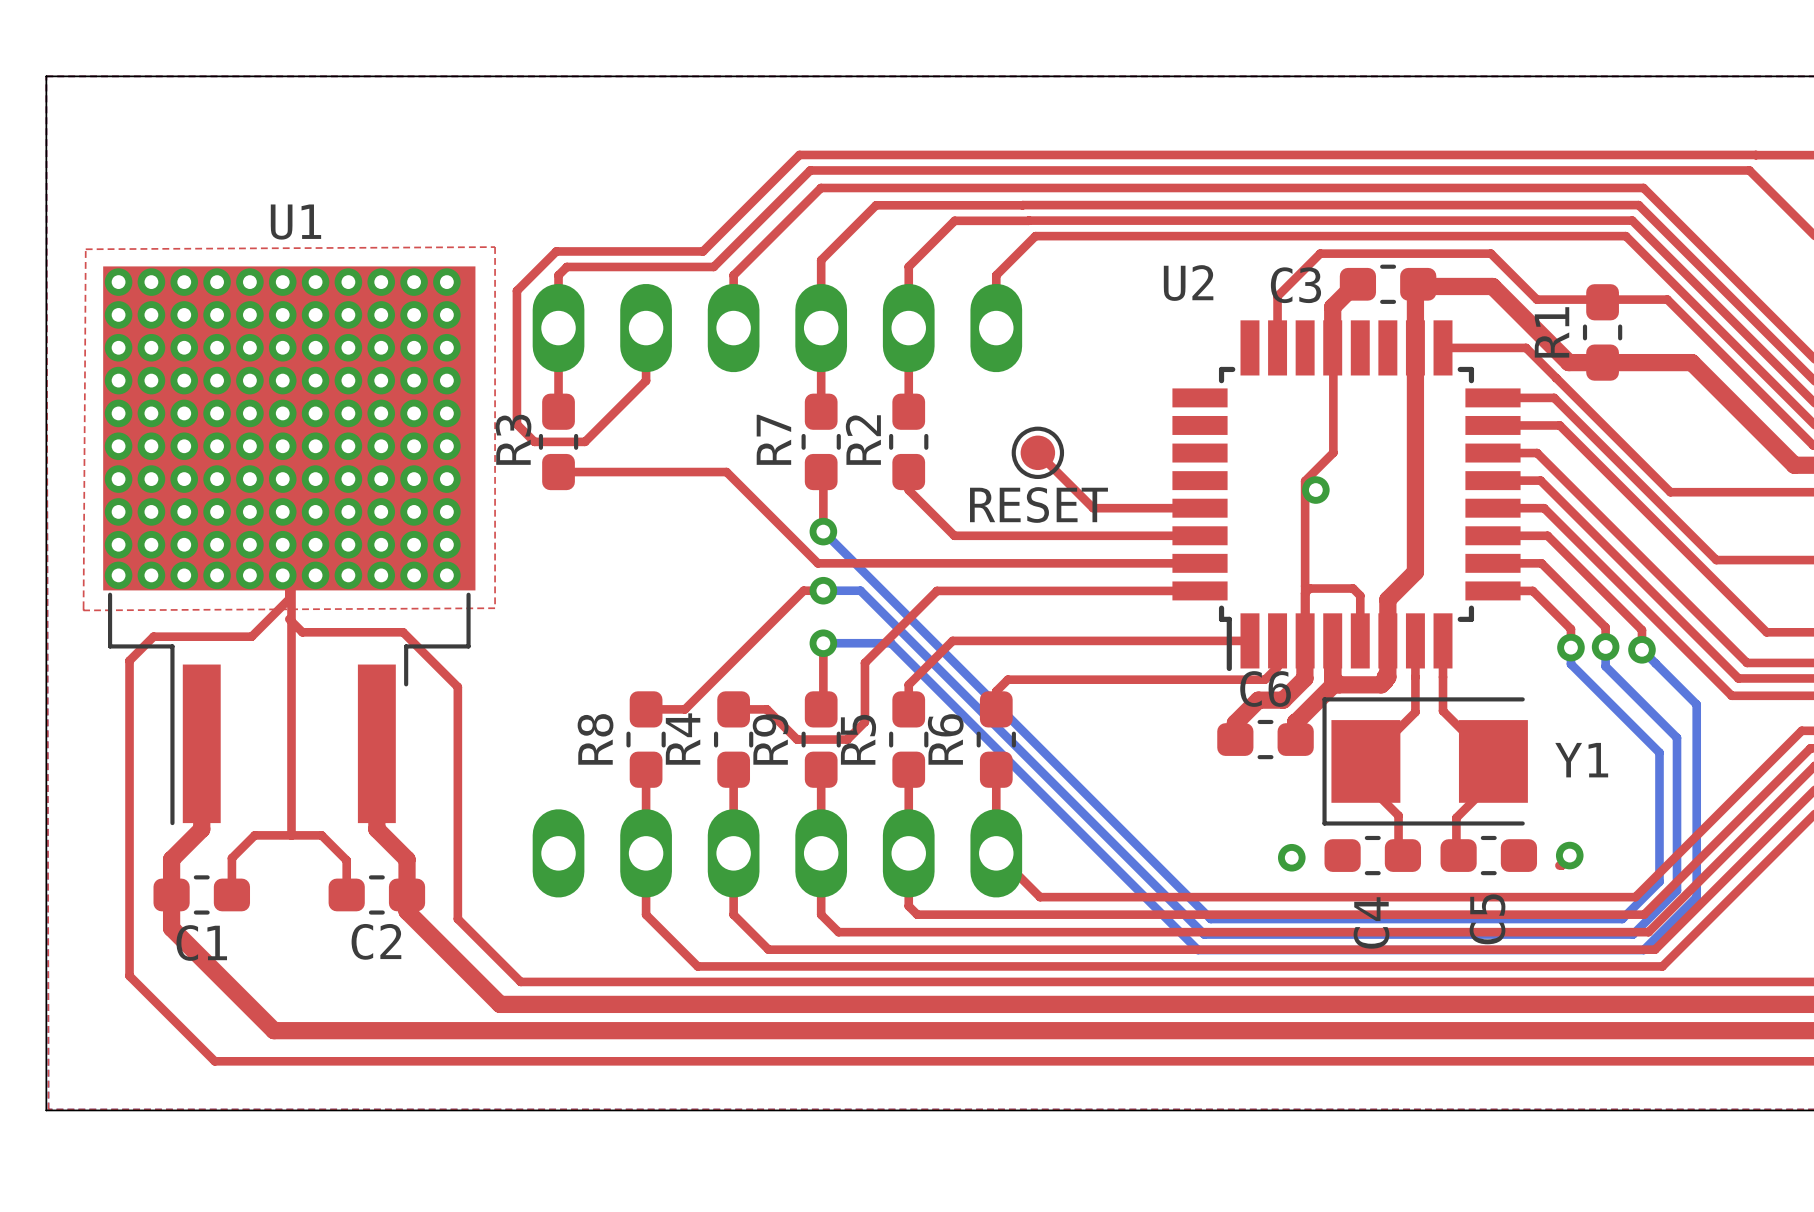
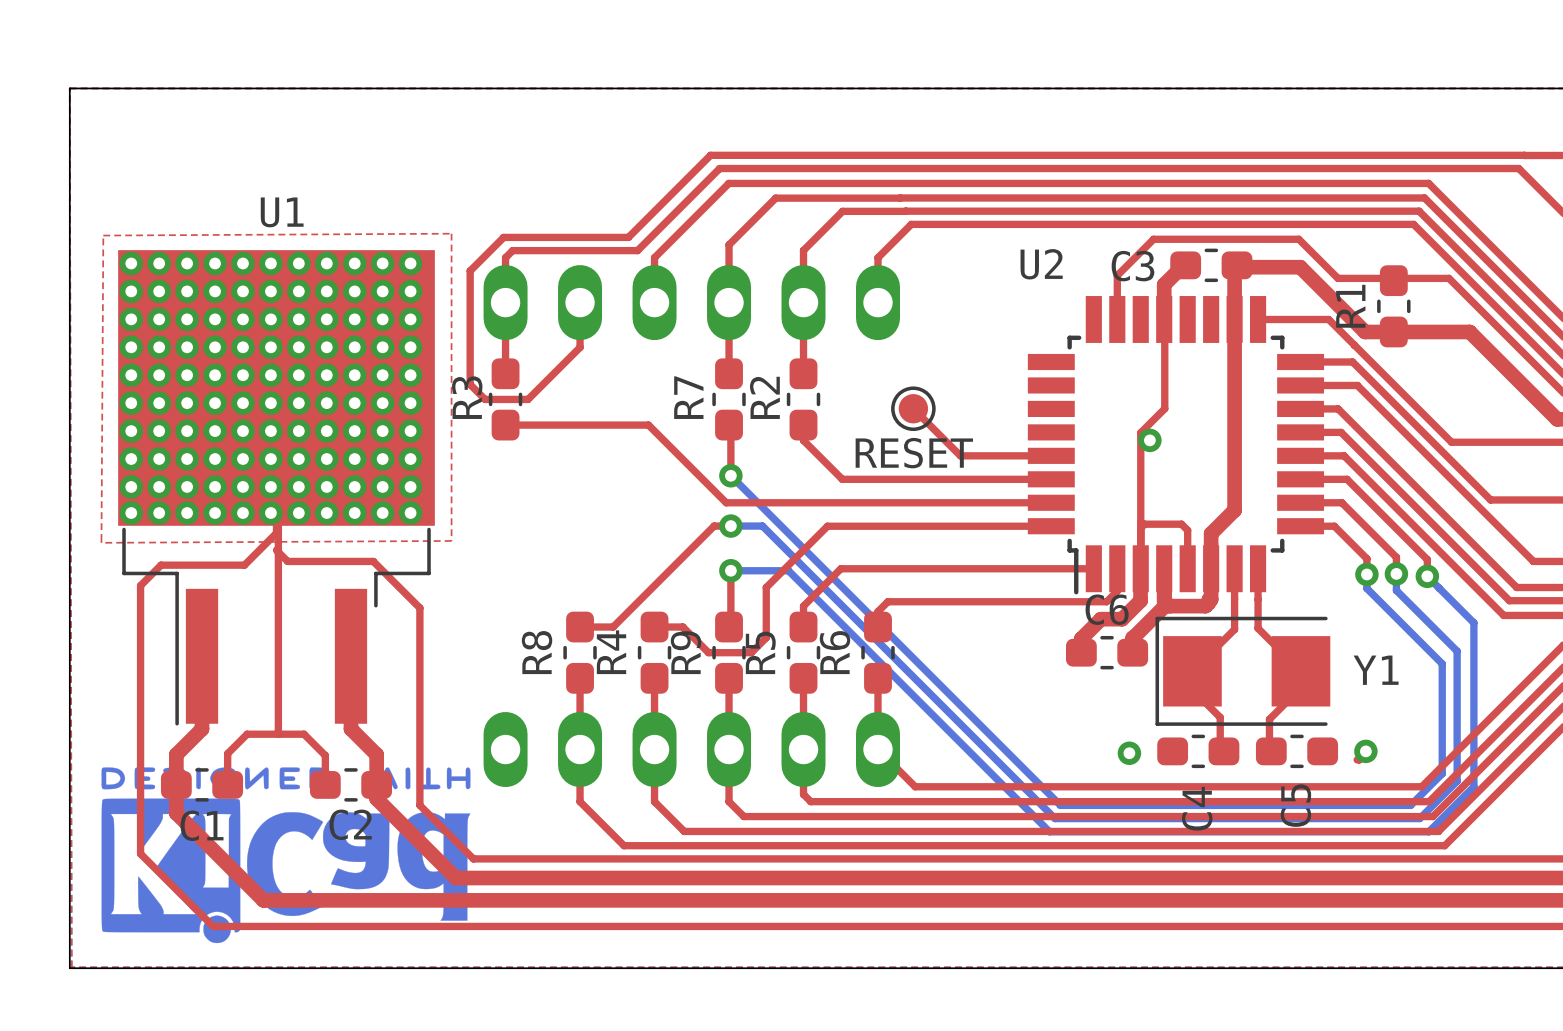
drawing: none -> [101, 767, 471, 944]

